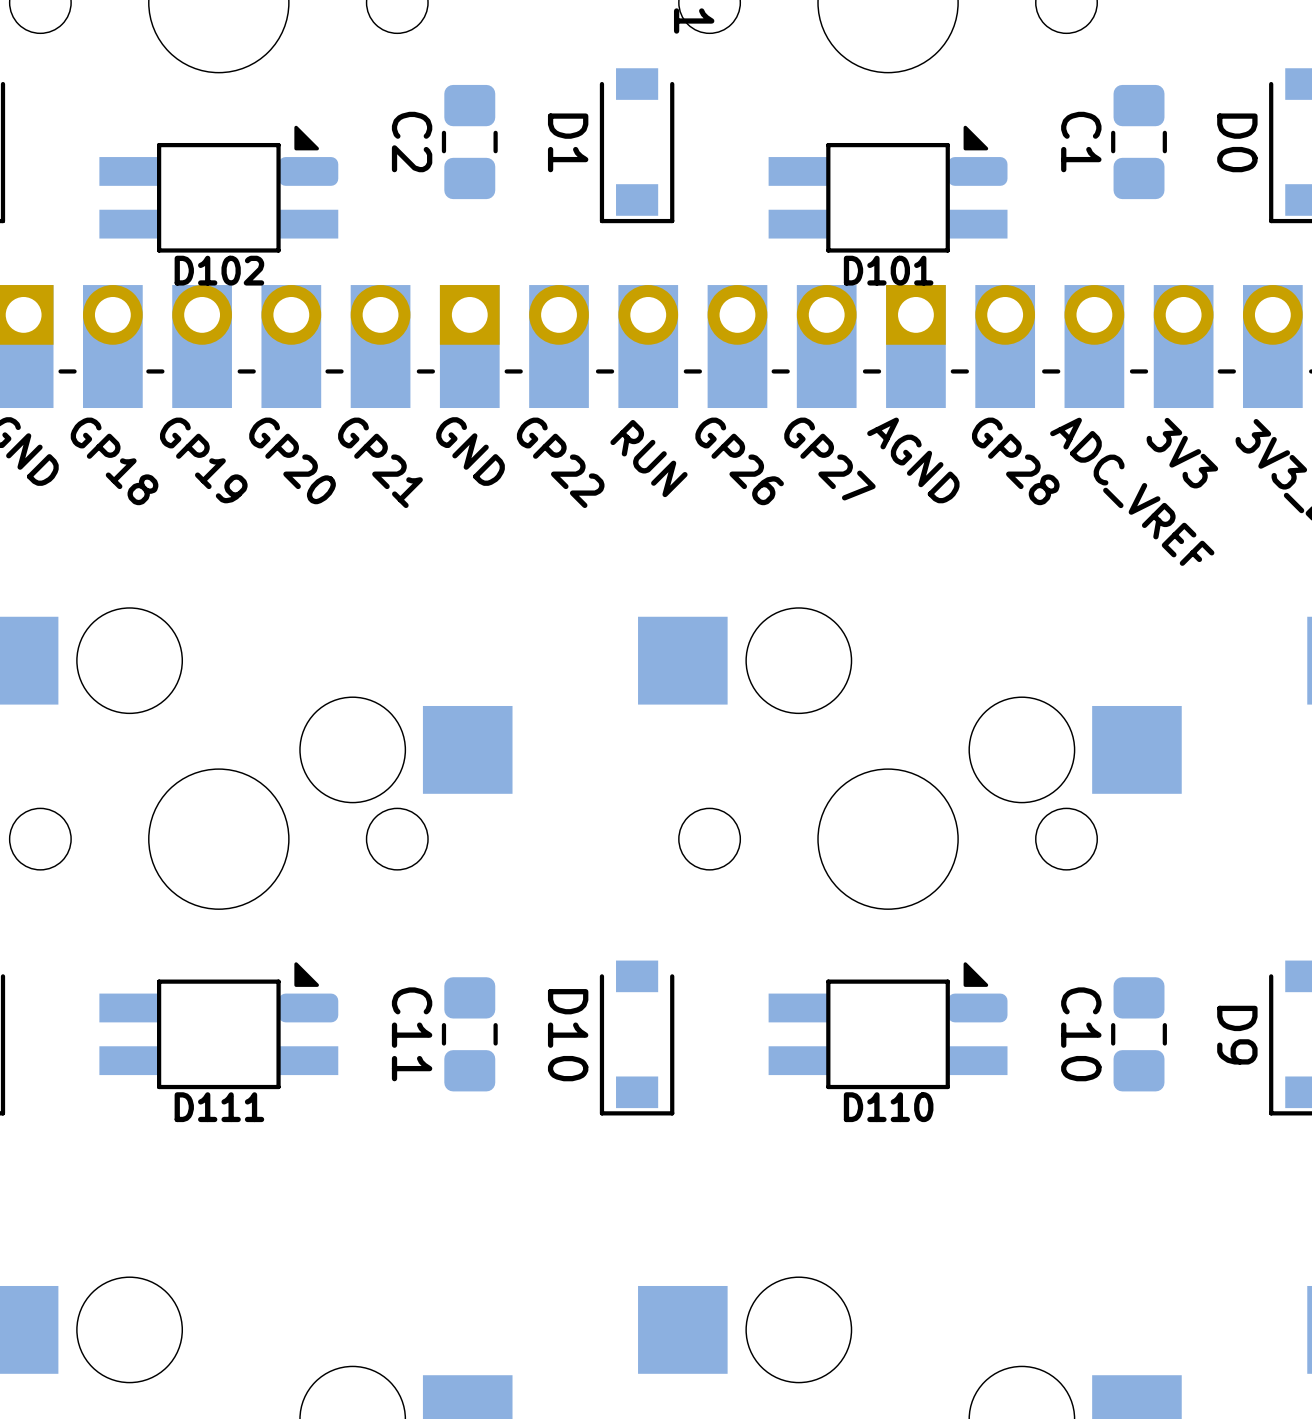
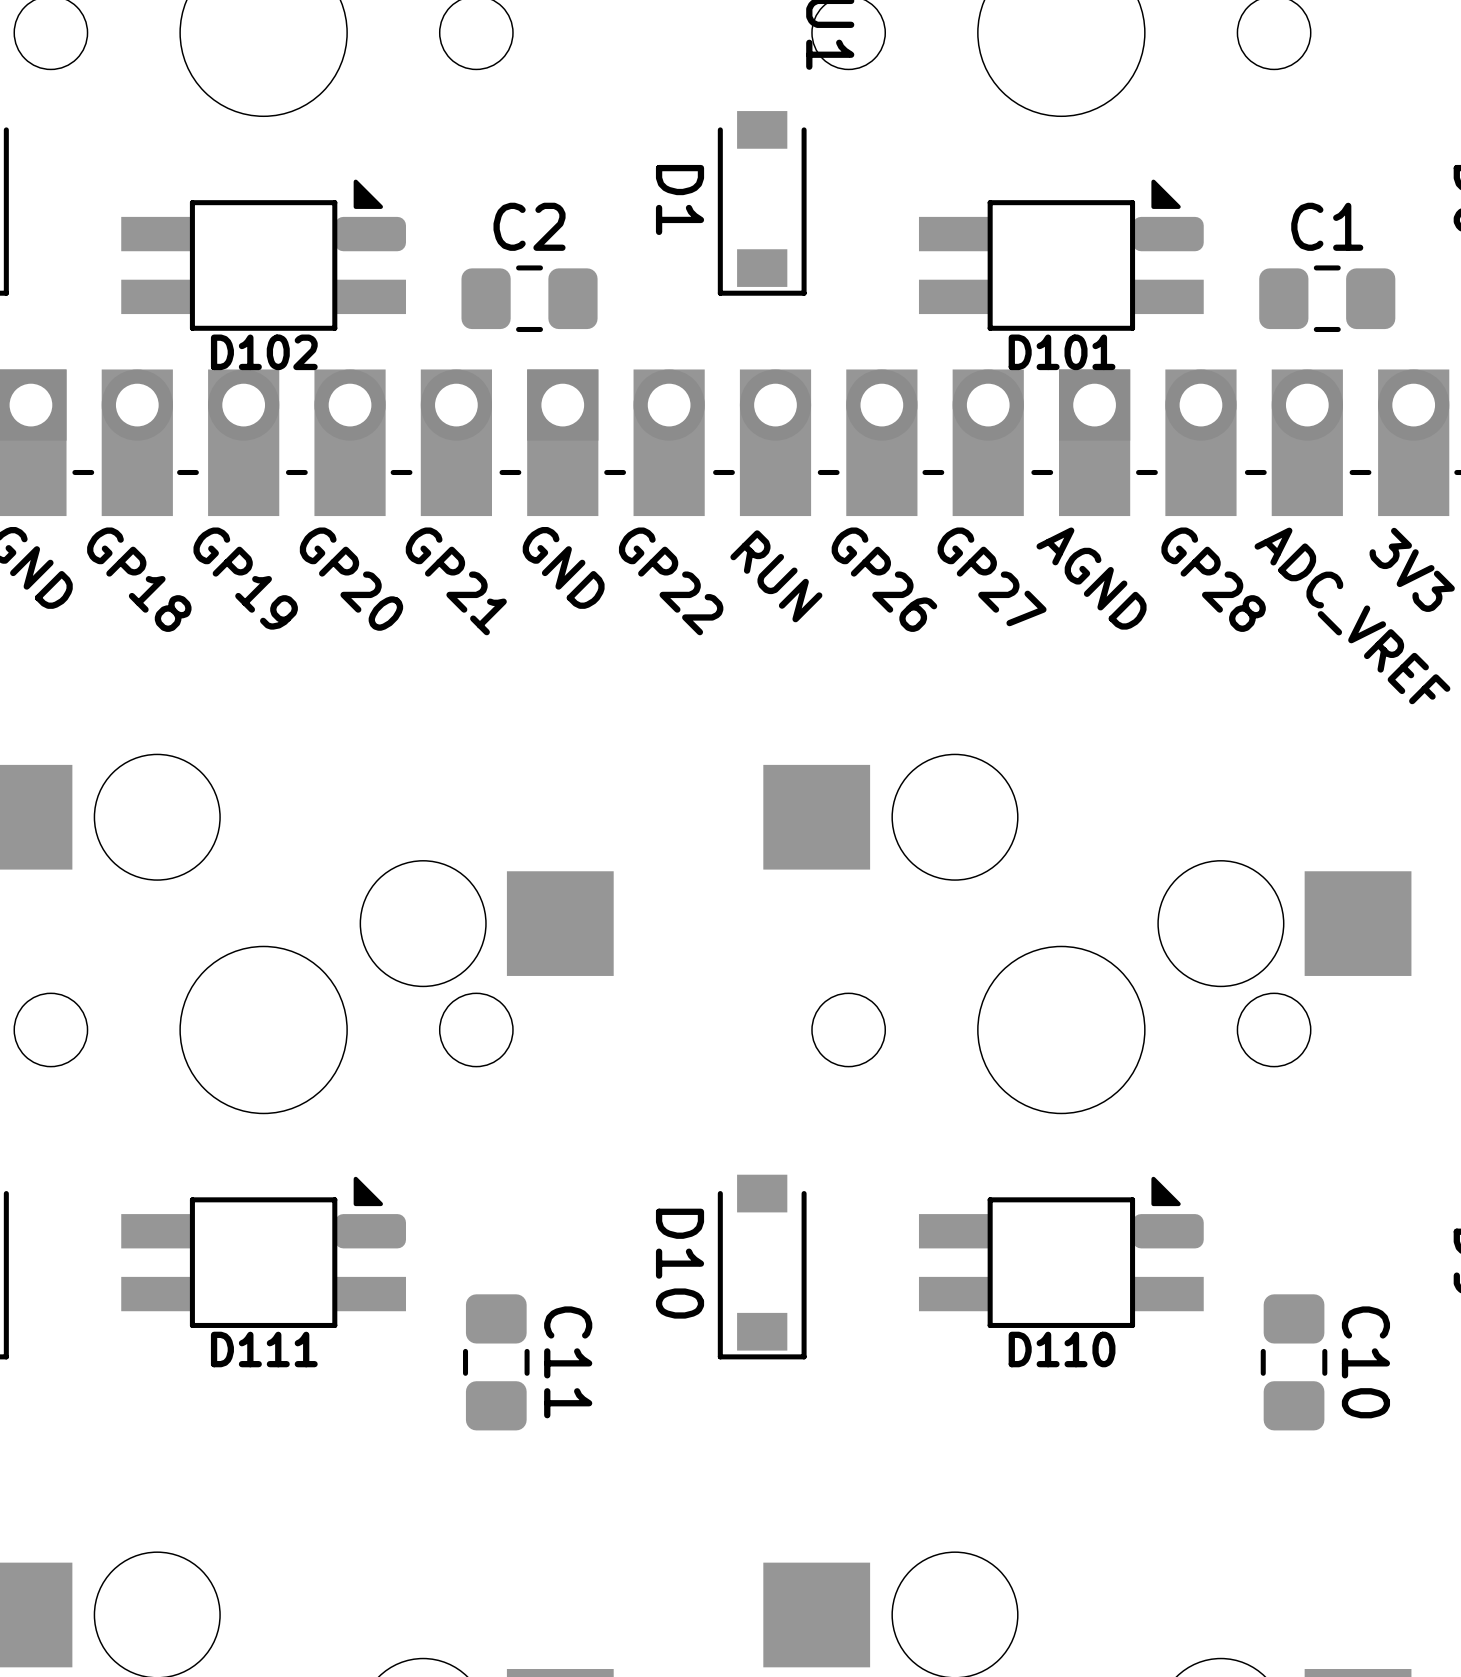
C2 rotation: 0° (469, 142) -> 90° clockwise (529, 298)
C2 position: (469, 142) -> (529, 298)
C1 rotation: 0° (1139, 142) -> 90° clockwise (1327, 298)
C1 position: (1139, 142) -> (1327, 298)
C11 name position: C11 (412, 1034) -> C11 (568, 1362)
C11 position: (469, 1034) -> (496, 1362)
C10 name position: C10 (1081, 1034) -> C10 (1365, 1362)
C10 position: (1139, 1034) -> (1294, 1362)

